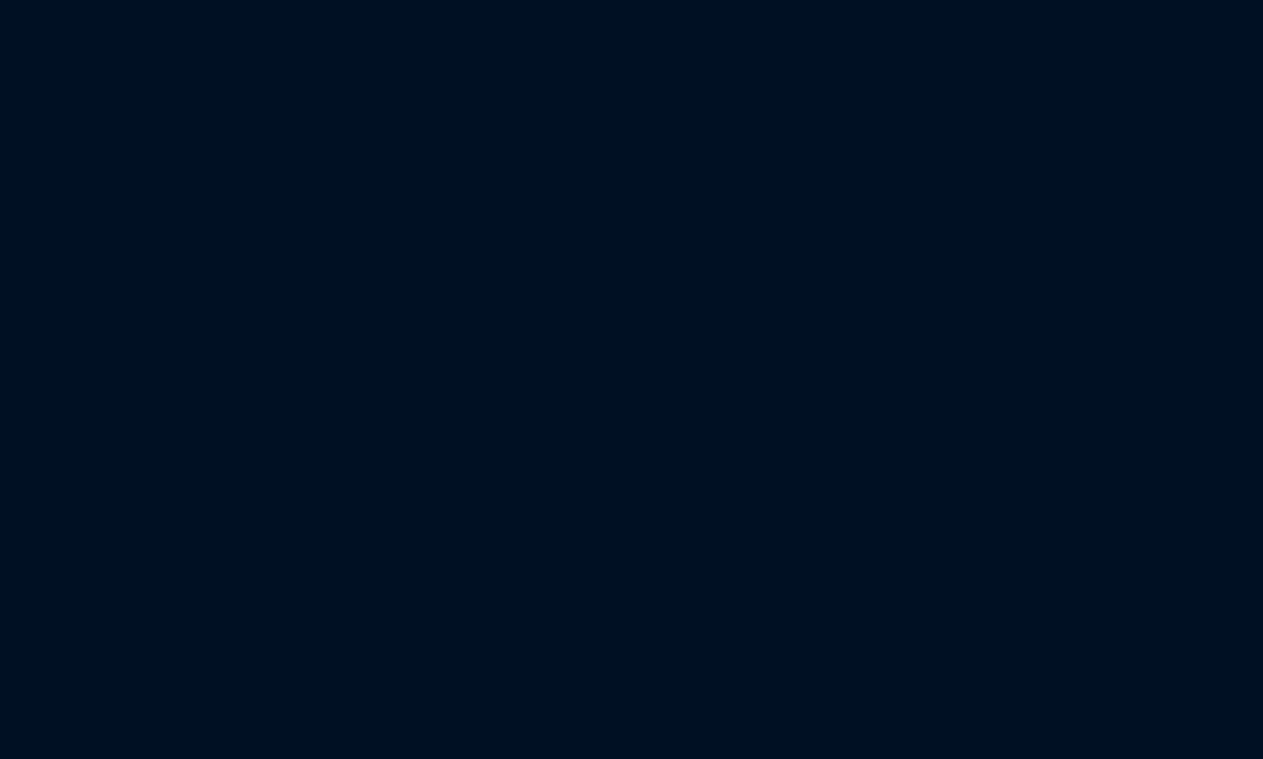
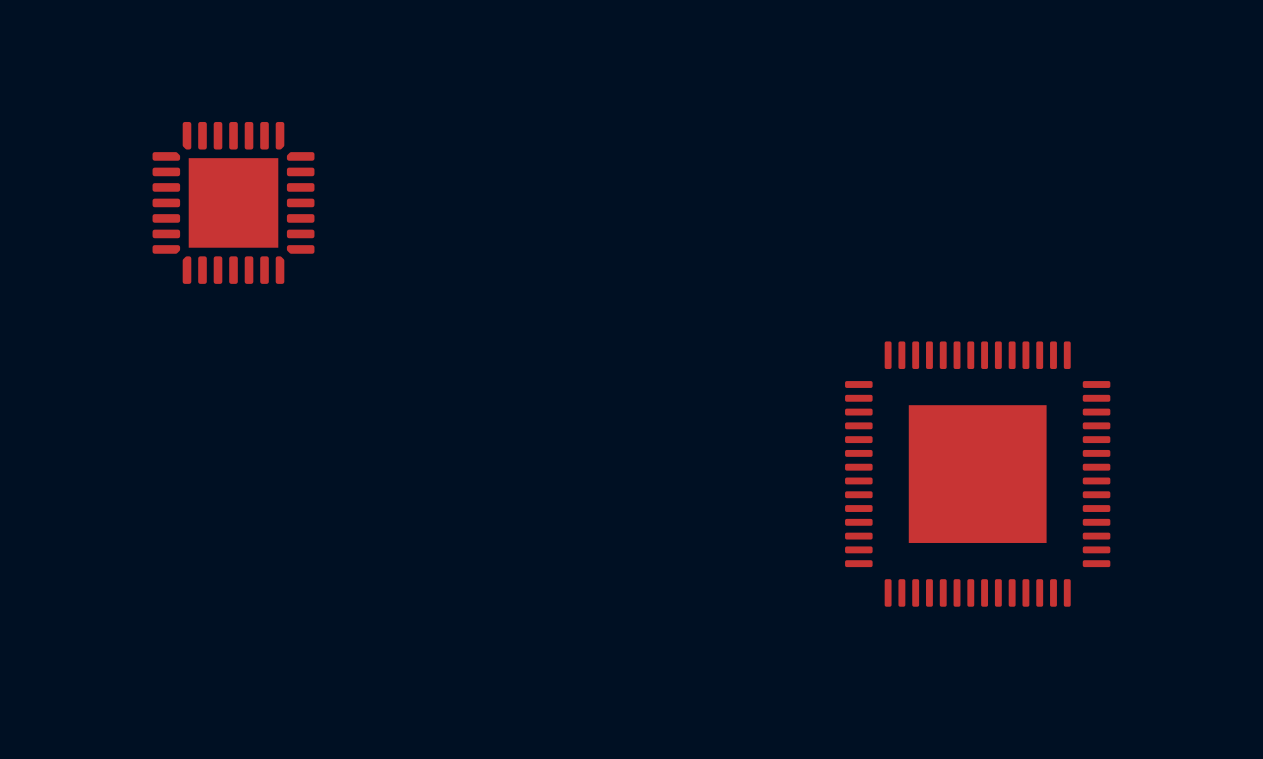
part: none -> (233, 202)
part: none -> (977, 474)

